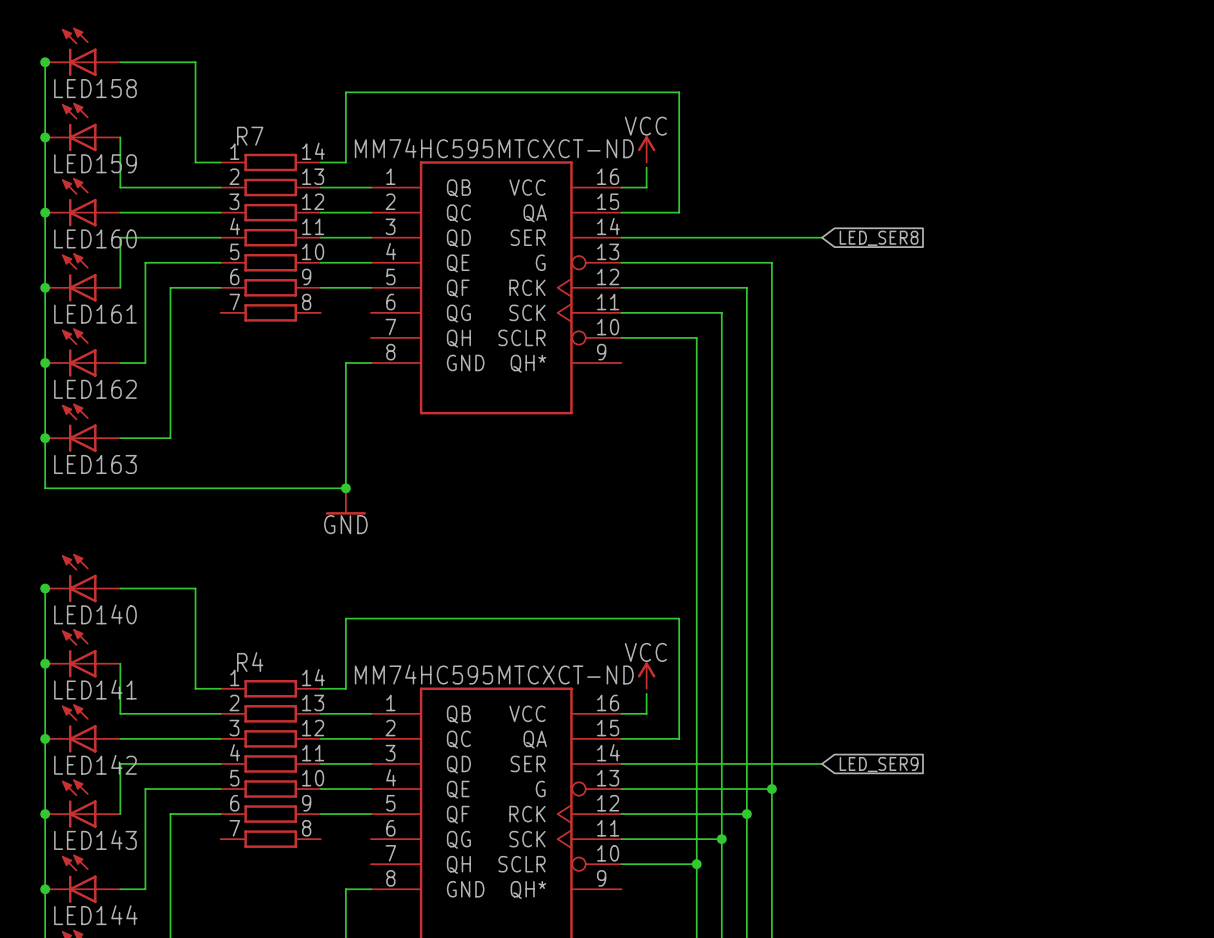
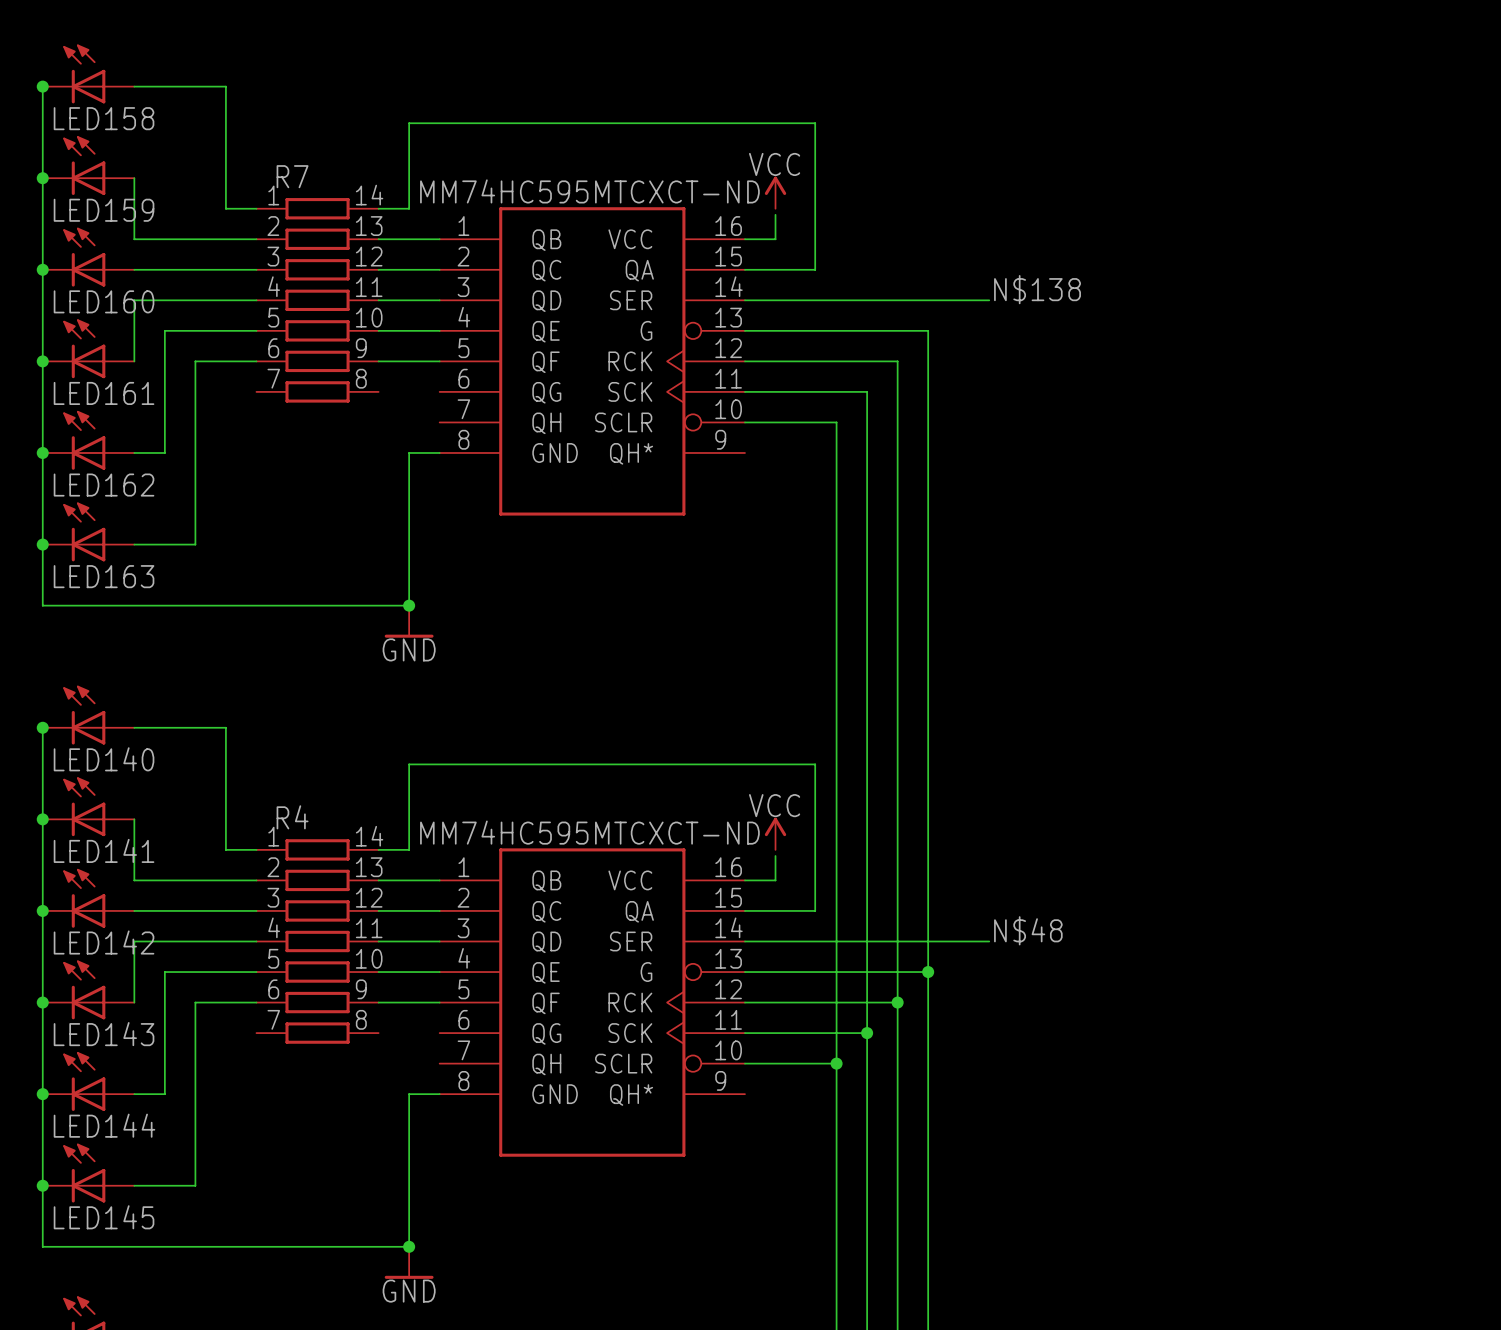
label: none -> N$138 (1037, 289)
global label: LED_SER8 (879, 238) -> none
label: none -> N$48 (1028, 930)
global label: LED_SER9 (879, 764) -> none

